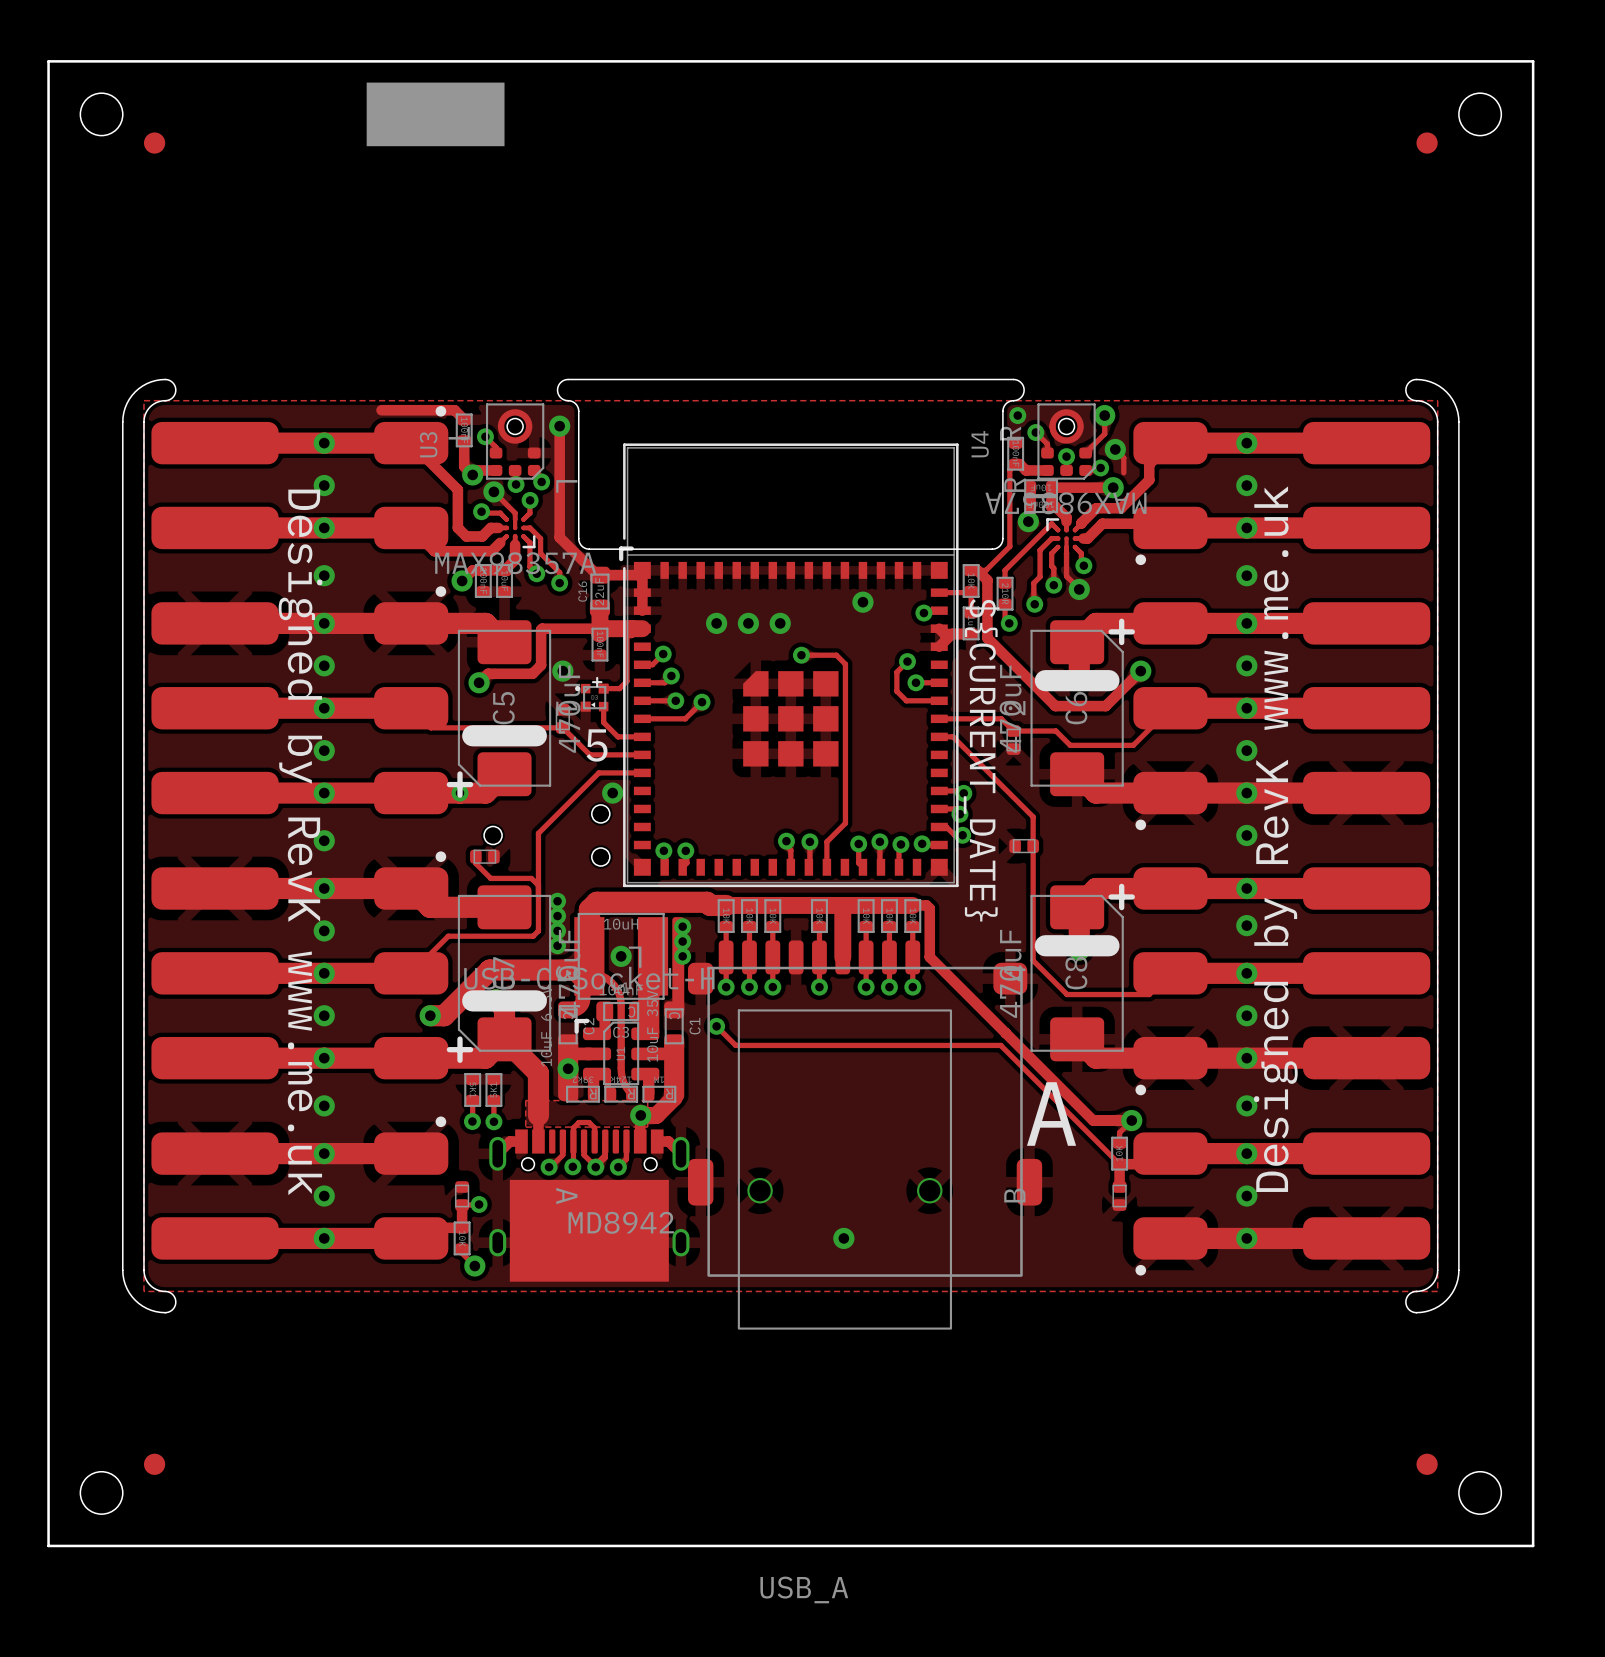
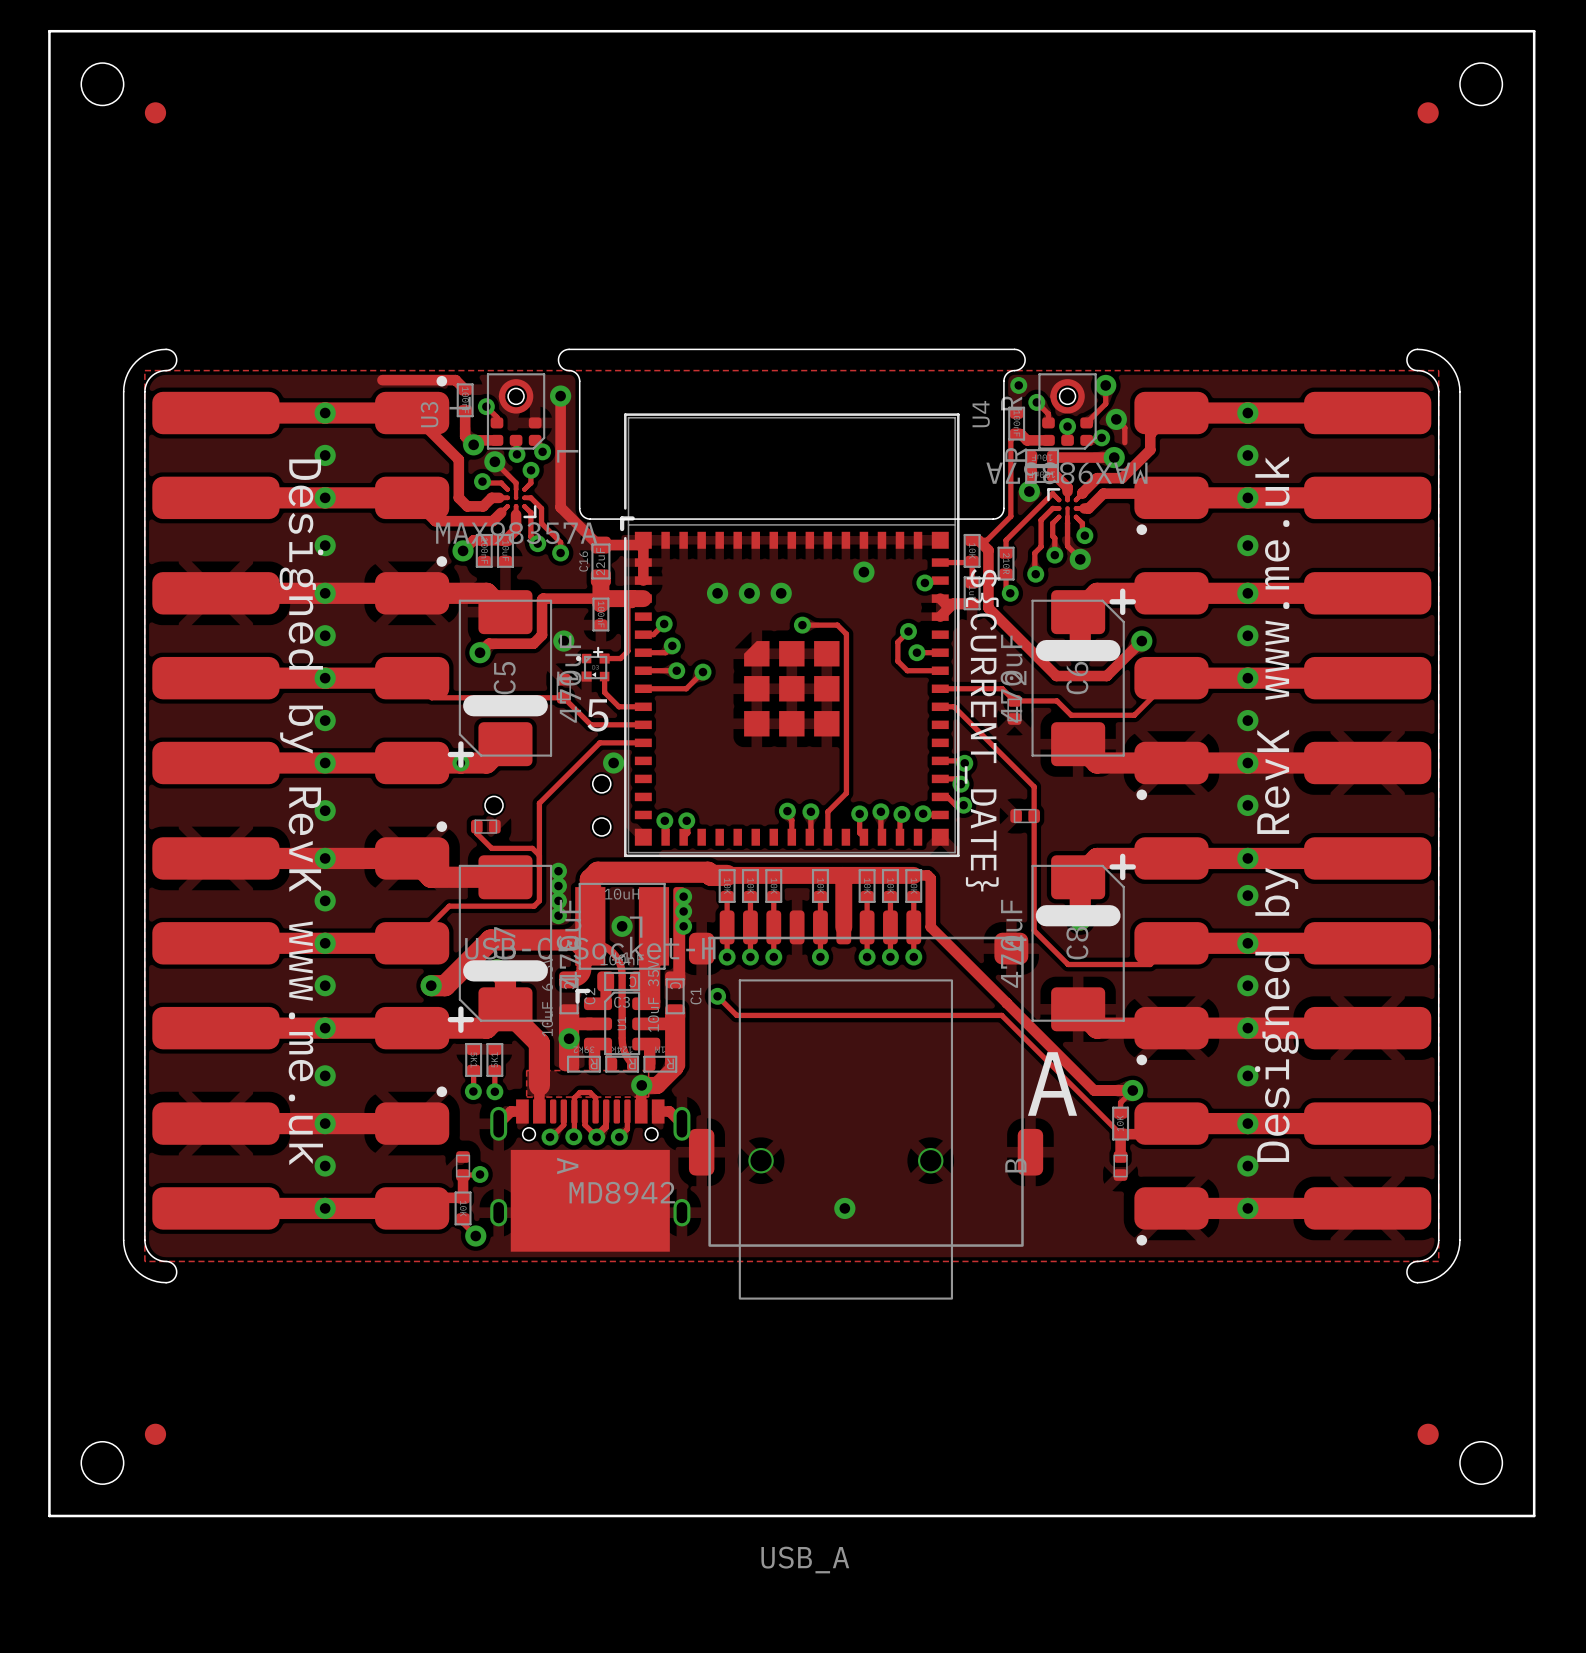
part footprint: [47, 60, 1535, 1548] -> [48, 29, 1536, 1518]

